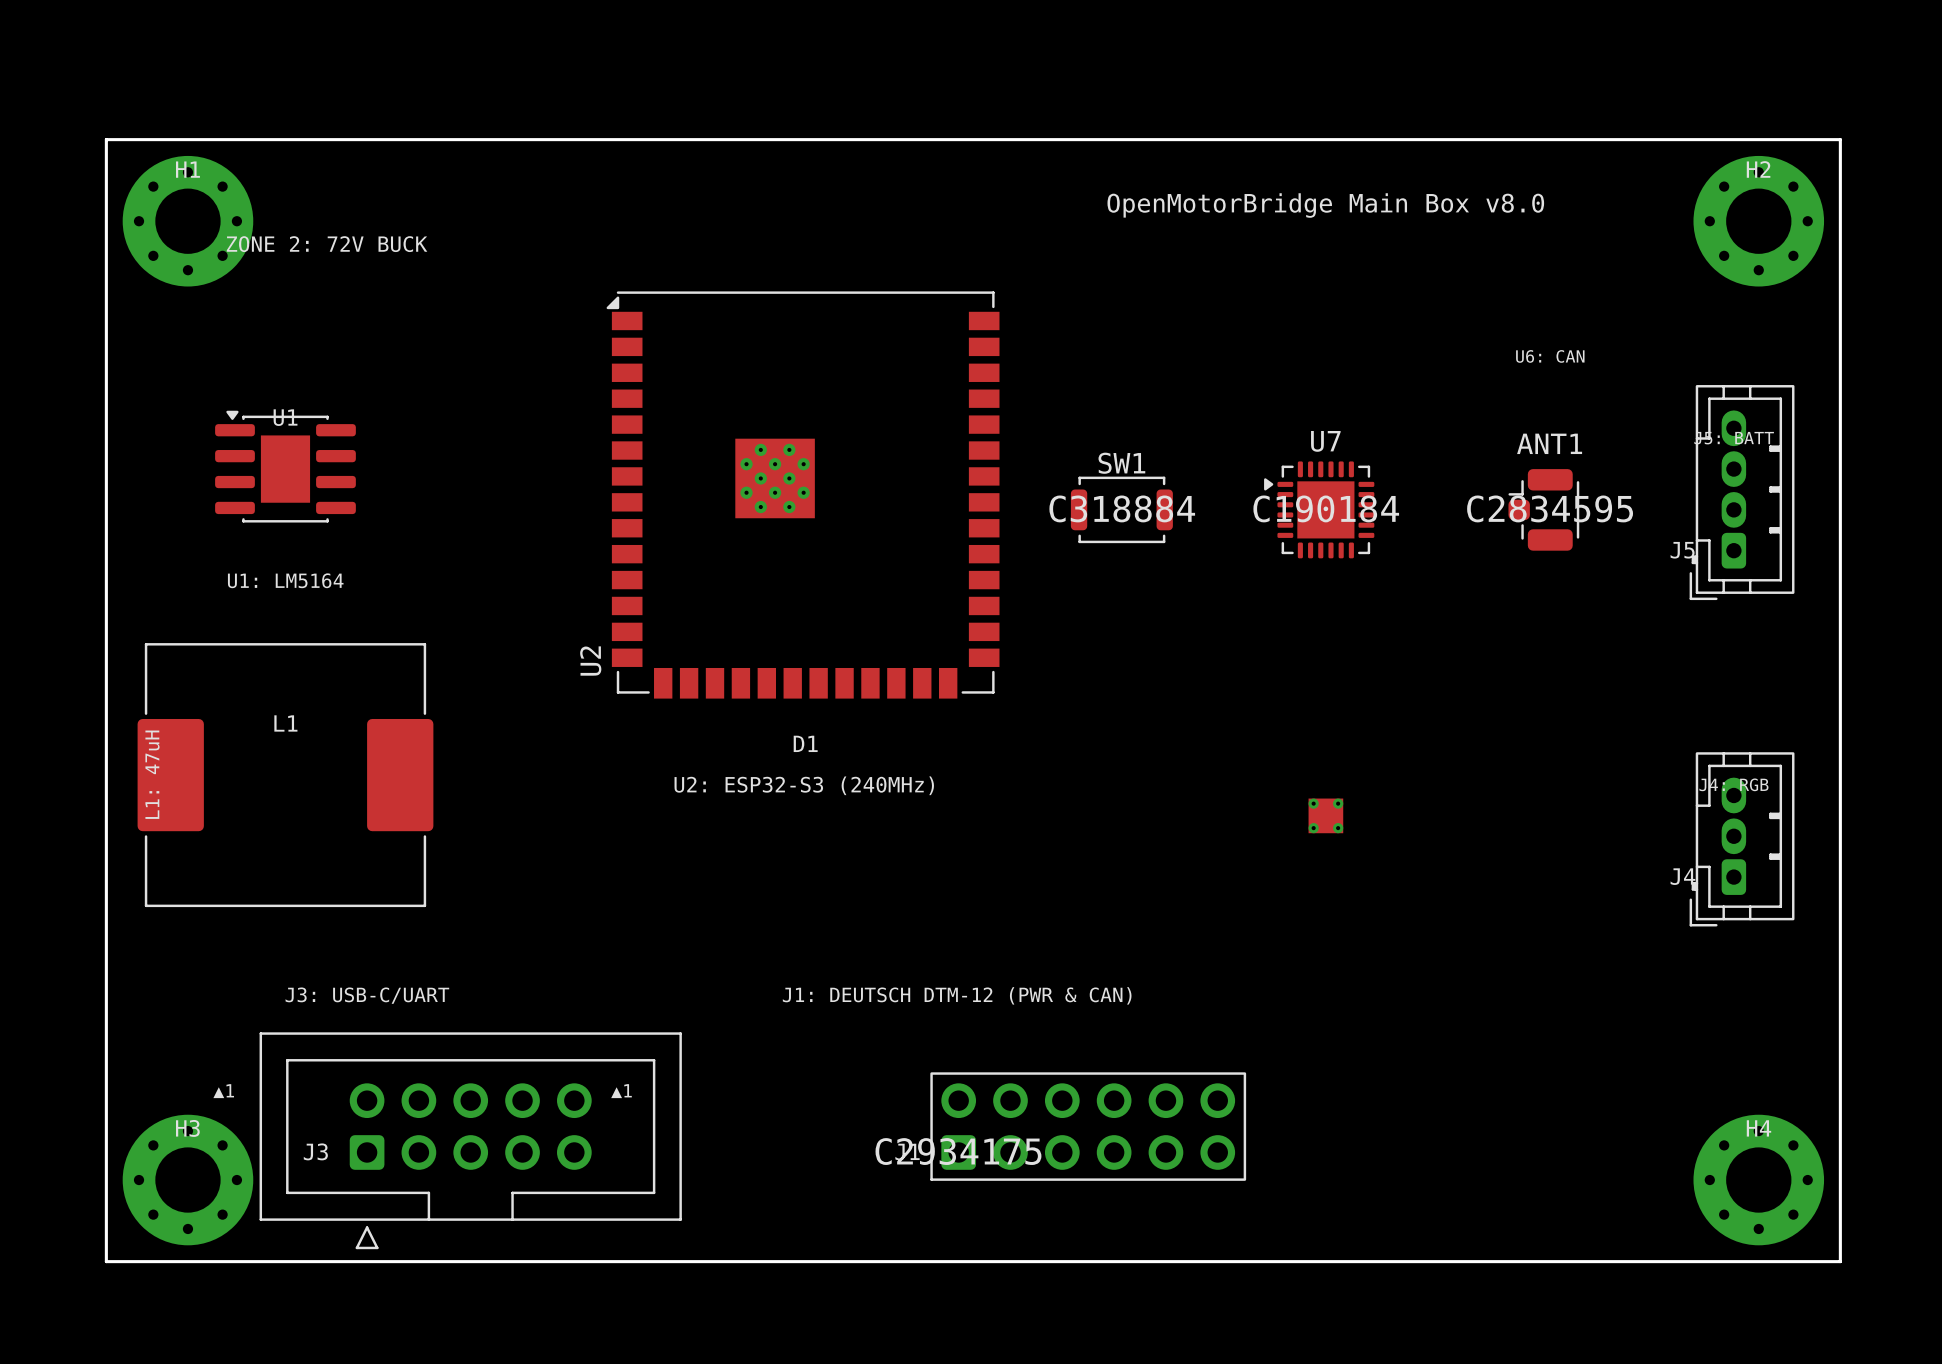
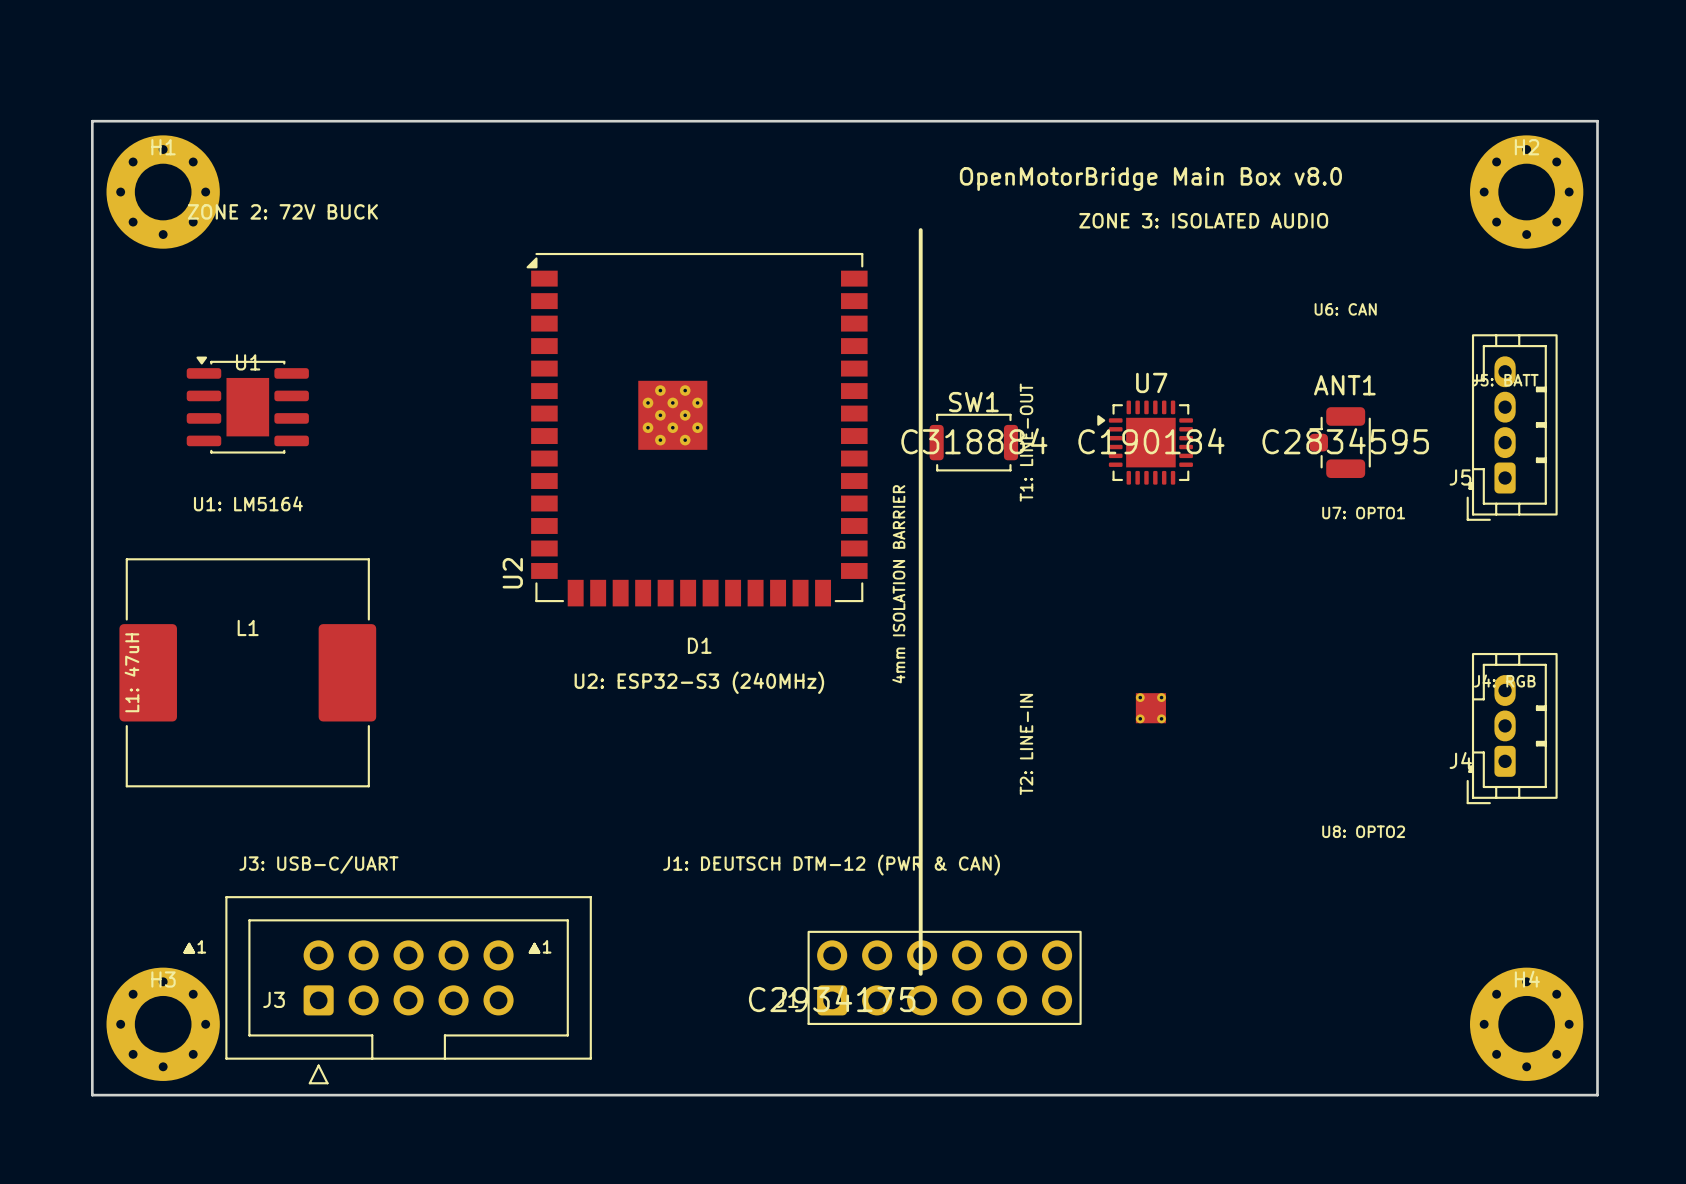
text: none -> ZONE 3: ISOLATED AUDIO (1203, 220)
line: none -> (920, 230) (920, 973)
text: none -> T1: LINE-OUT (1026, 442)
text: none -> U7: OPTO1 (1363, 513)
text: none -> 4mm ISOLATION BARRIER (898, 584)
text: none -> T2: LINE-IN (1026, 744)
text: none -> U8: OPTO2 (1363, 831)

